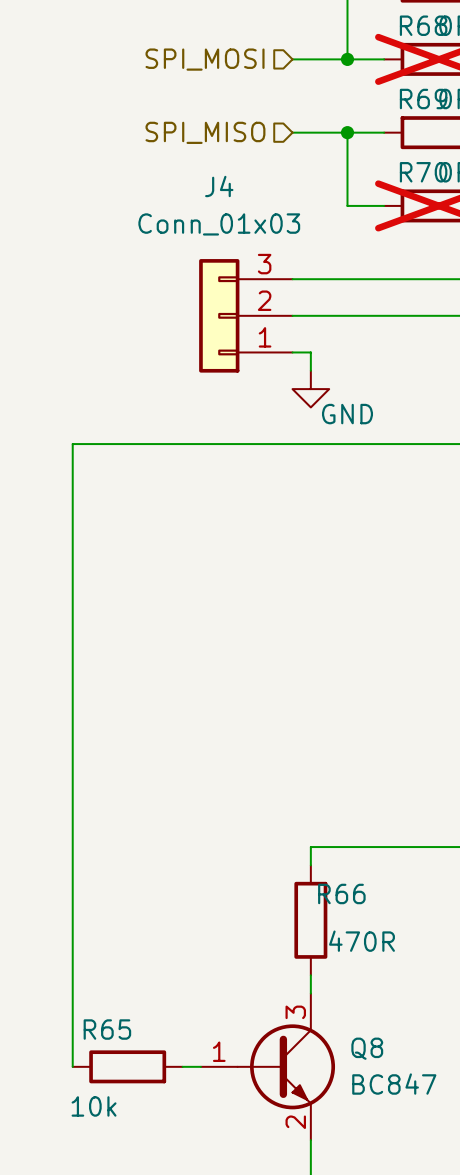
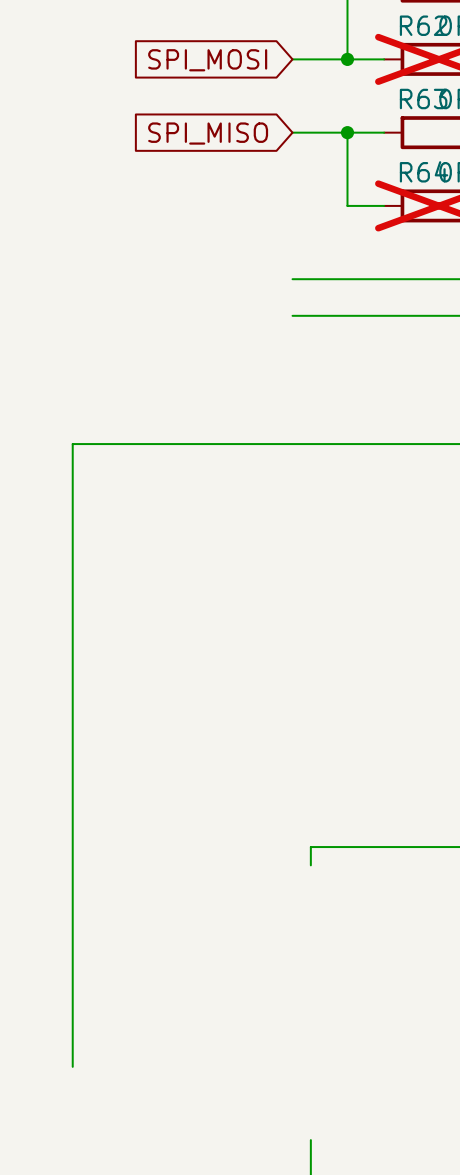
R68 name: R68 (423, 25) -> R62 (423, 25)
hierarchical label: SPI_MOSI (205, 59) -> none
global label: none -> SPI_MOSI (207, 60)
R69 name: R69 (423, 99) -> R63 (423, 99)
hierarchical label: SPI_MISO (205, 132) -> none
global label: none -> SPI_MISO (208, 133)
R70 name: R70 (423, 172) -> R64 (424, 171)
J4: Conn_01x03 (245, 315) -> none
wire: (292, 352) (310, 352) (310, 370) -> none
power symbol: GND (310, 389) -> none
R66: 470R (310, 920) -> none
wire: (310, 975) (310, 993) -> none
R65: 10k (127, 1066) -> none
wire: (182, 1066) (200, 1066) -> none
Q8: BC847 (267, 1066) -> none

